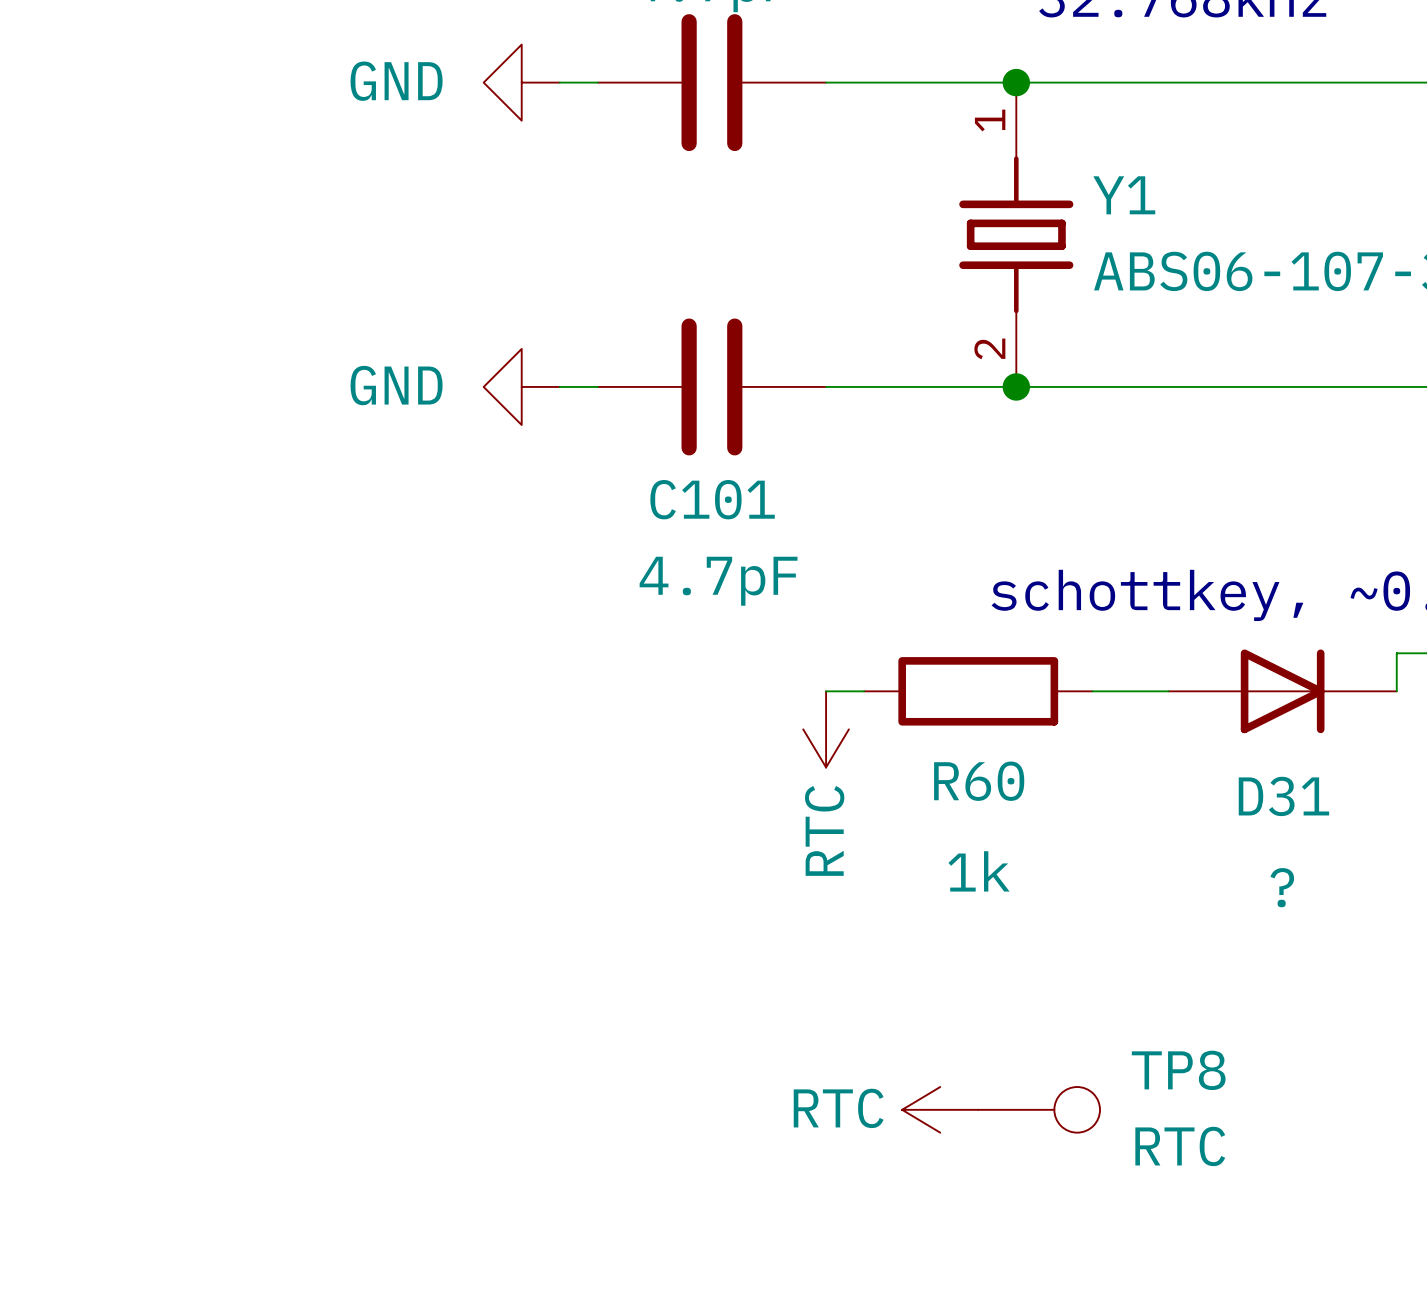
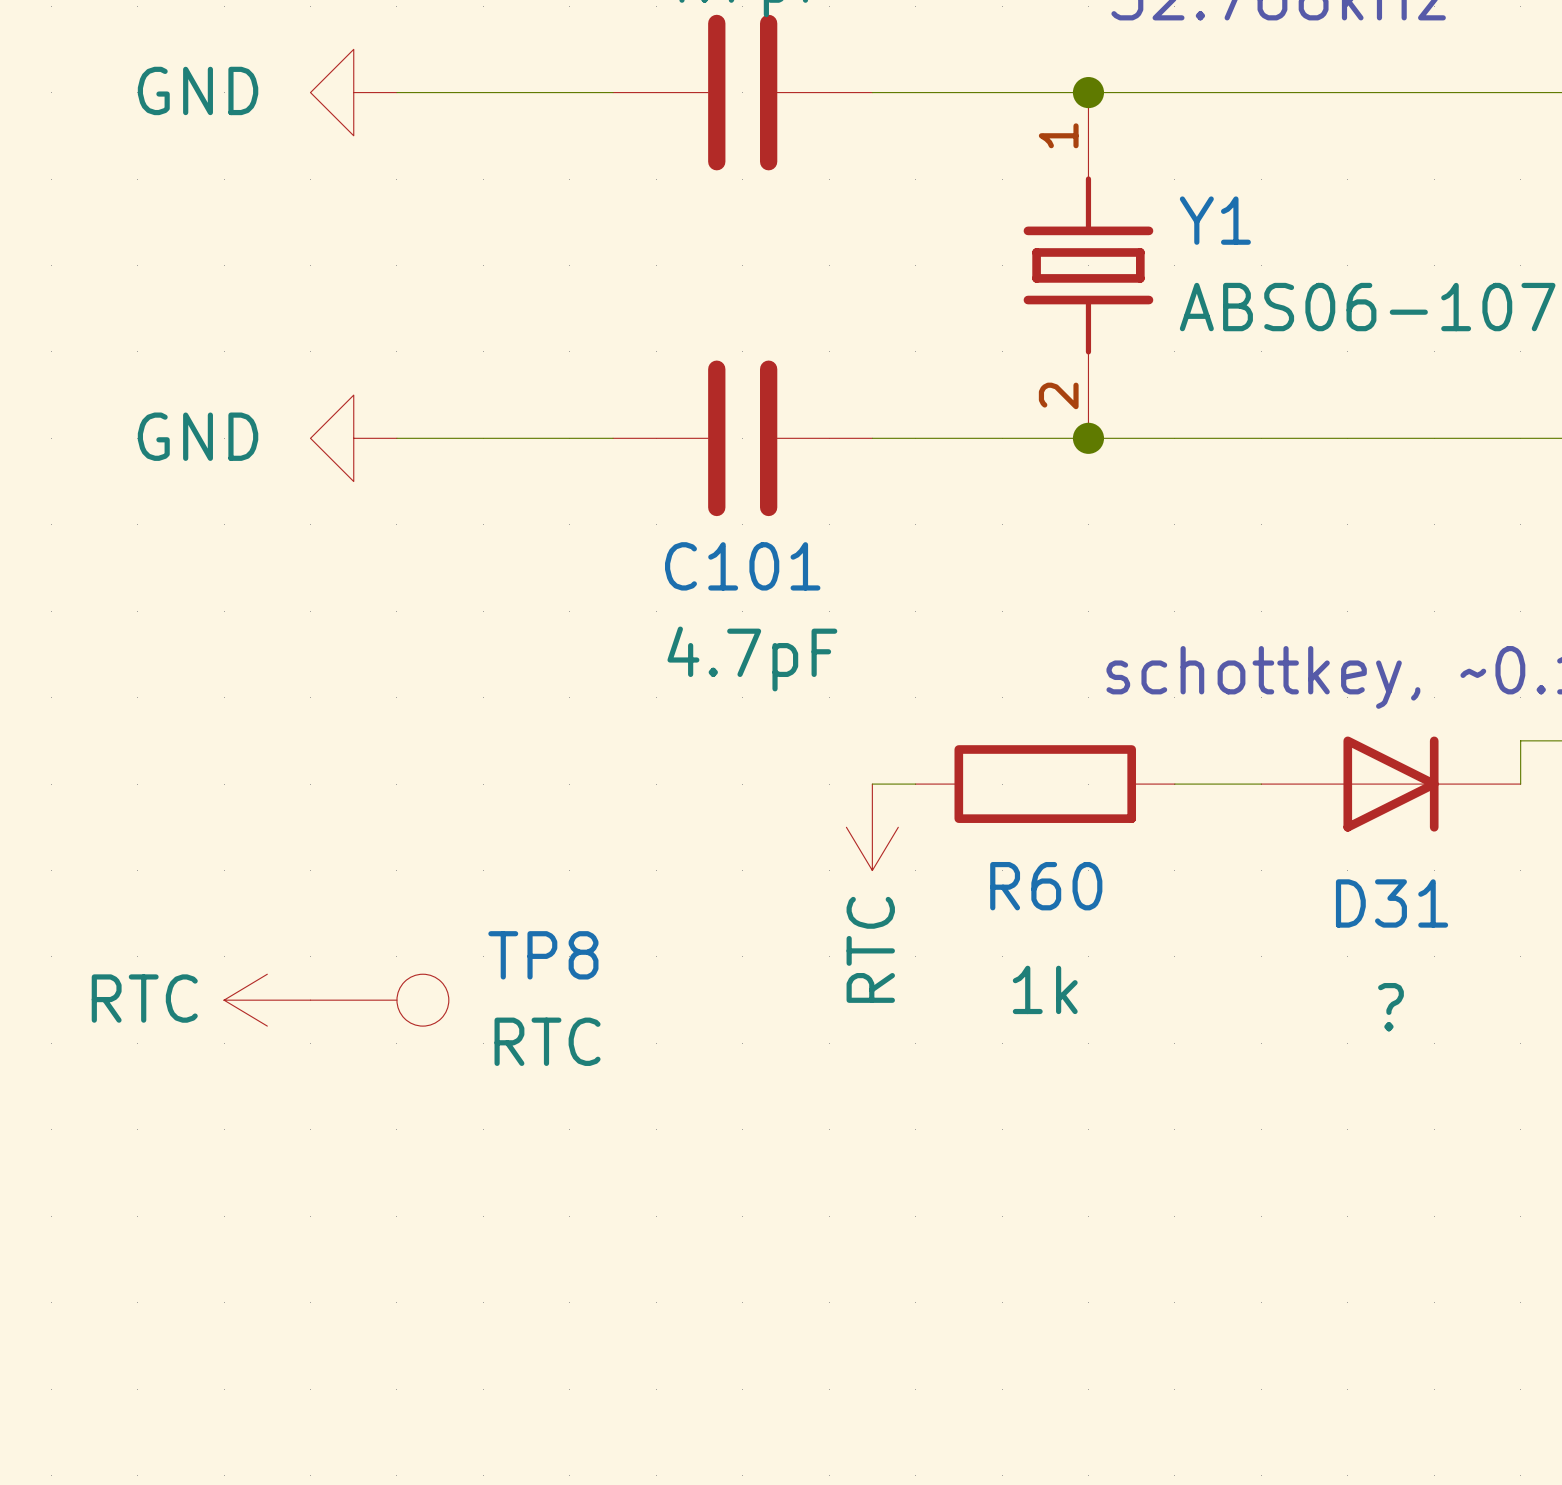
wire: none -> (396, 92) (569, 92)
power symbol position: GND (521, 82) -> GND (353, 92)
wire: none -> (396, 438) (569, 438)
power symbol position: GND (521, 386) -> GND (353, 438)
power symbol position: RTC (940, 1109) -> RTC (267, 1000)
TP8 position: (1039, 1109) -> (379, 1000)

